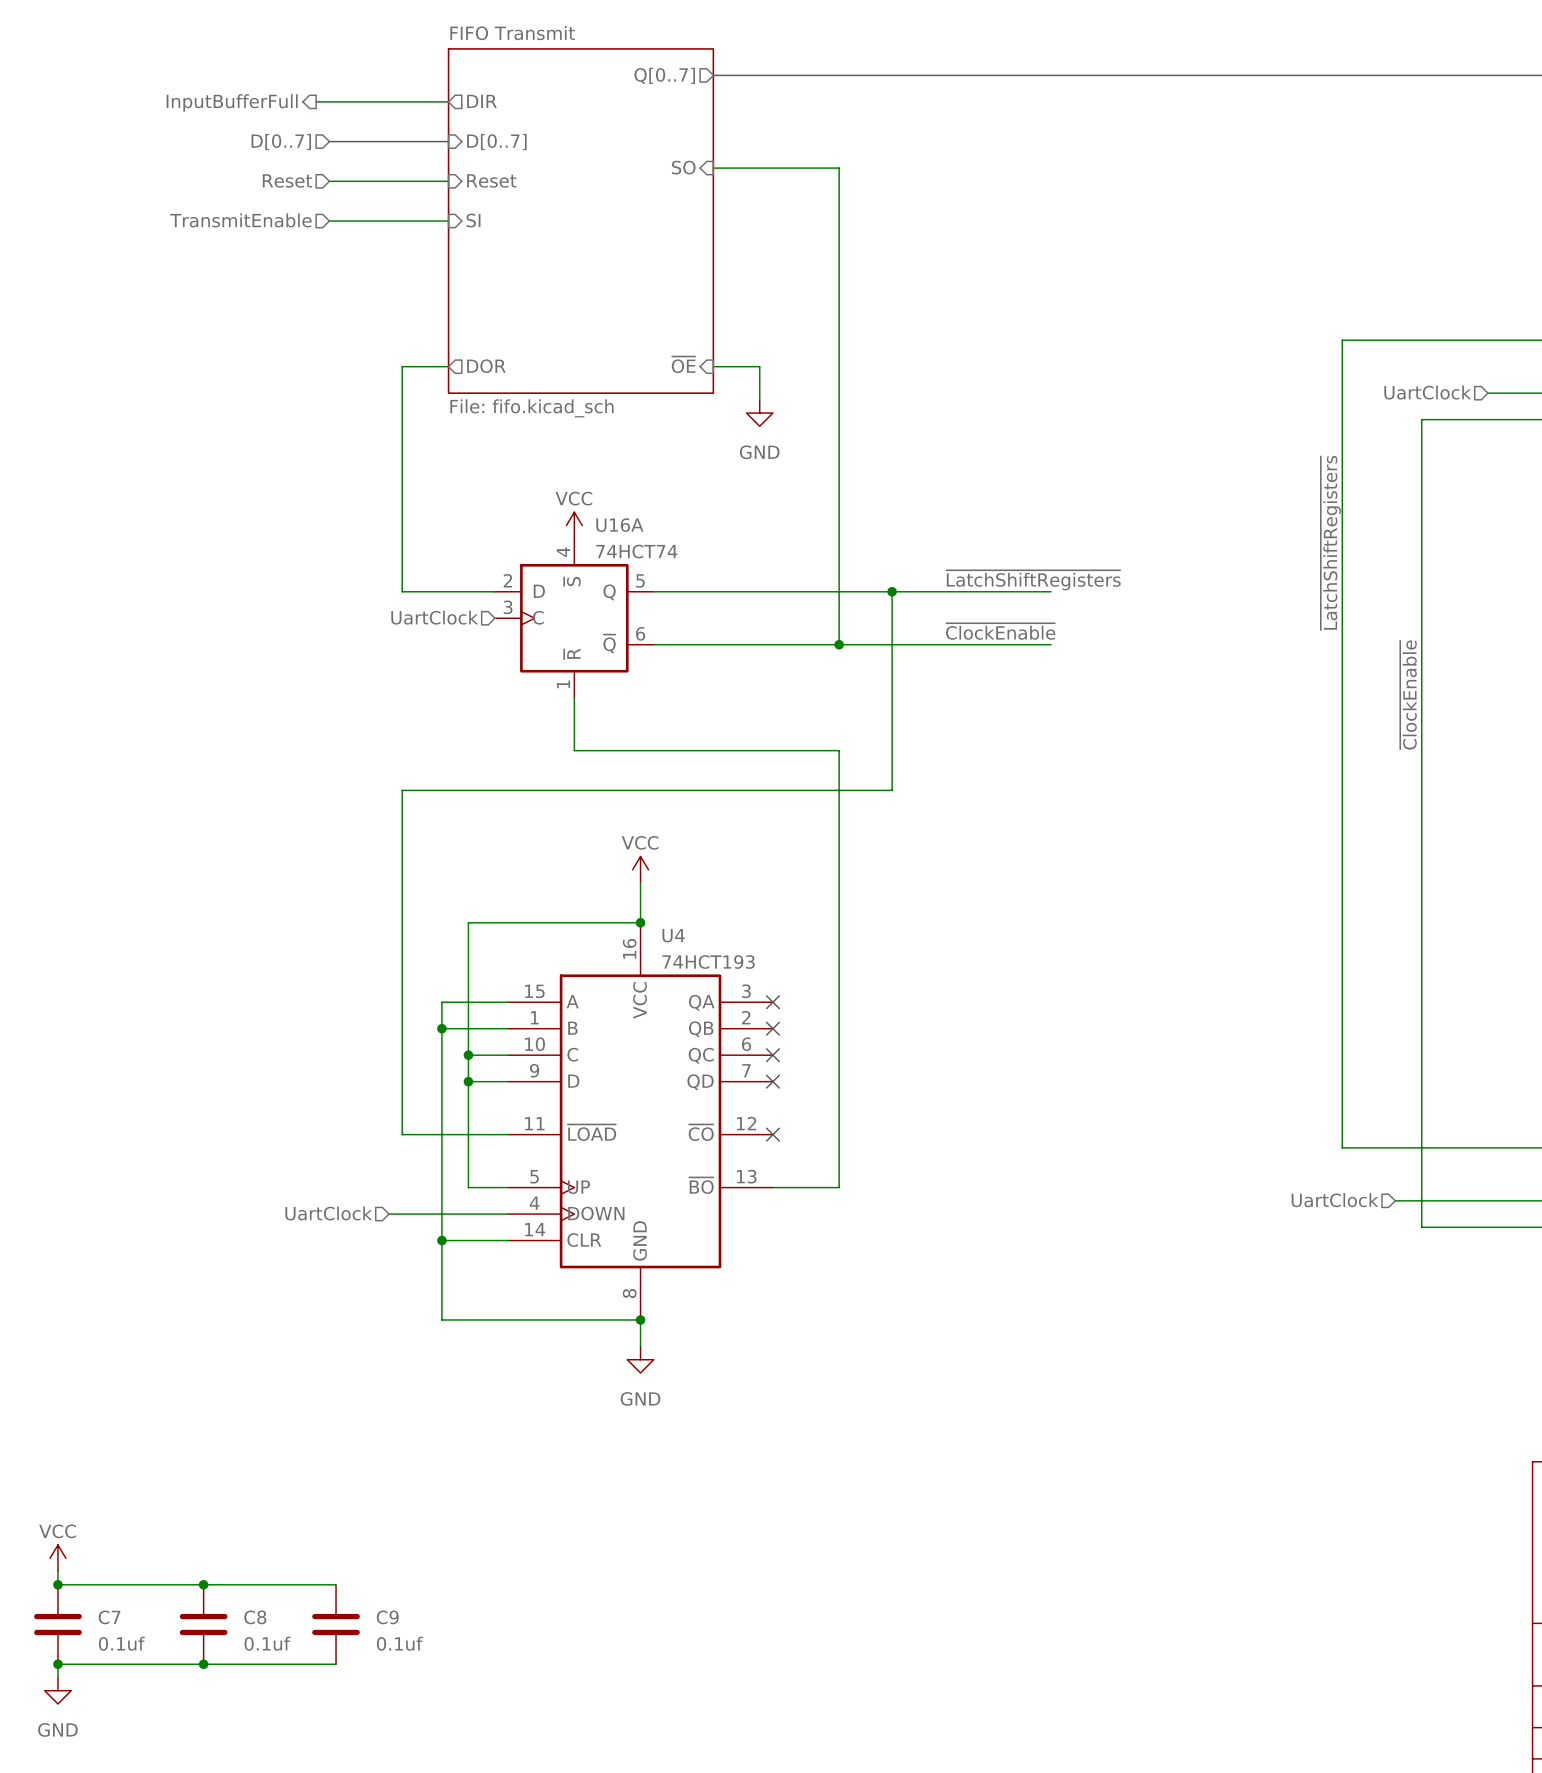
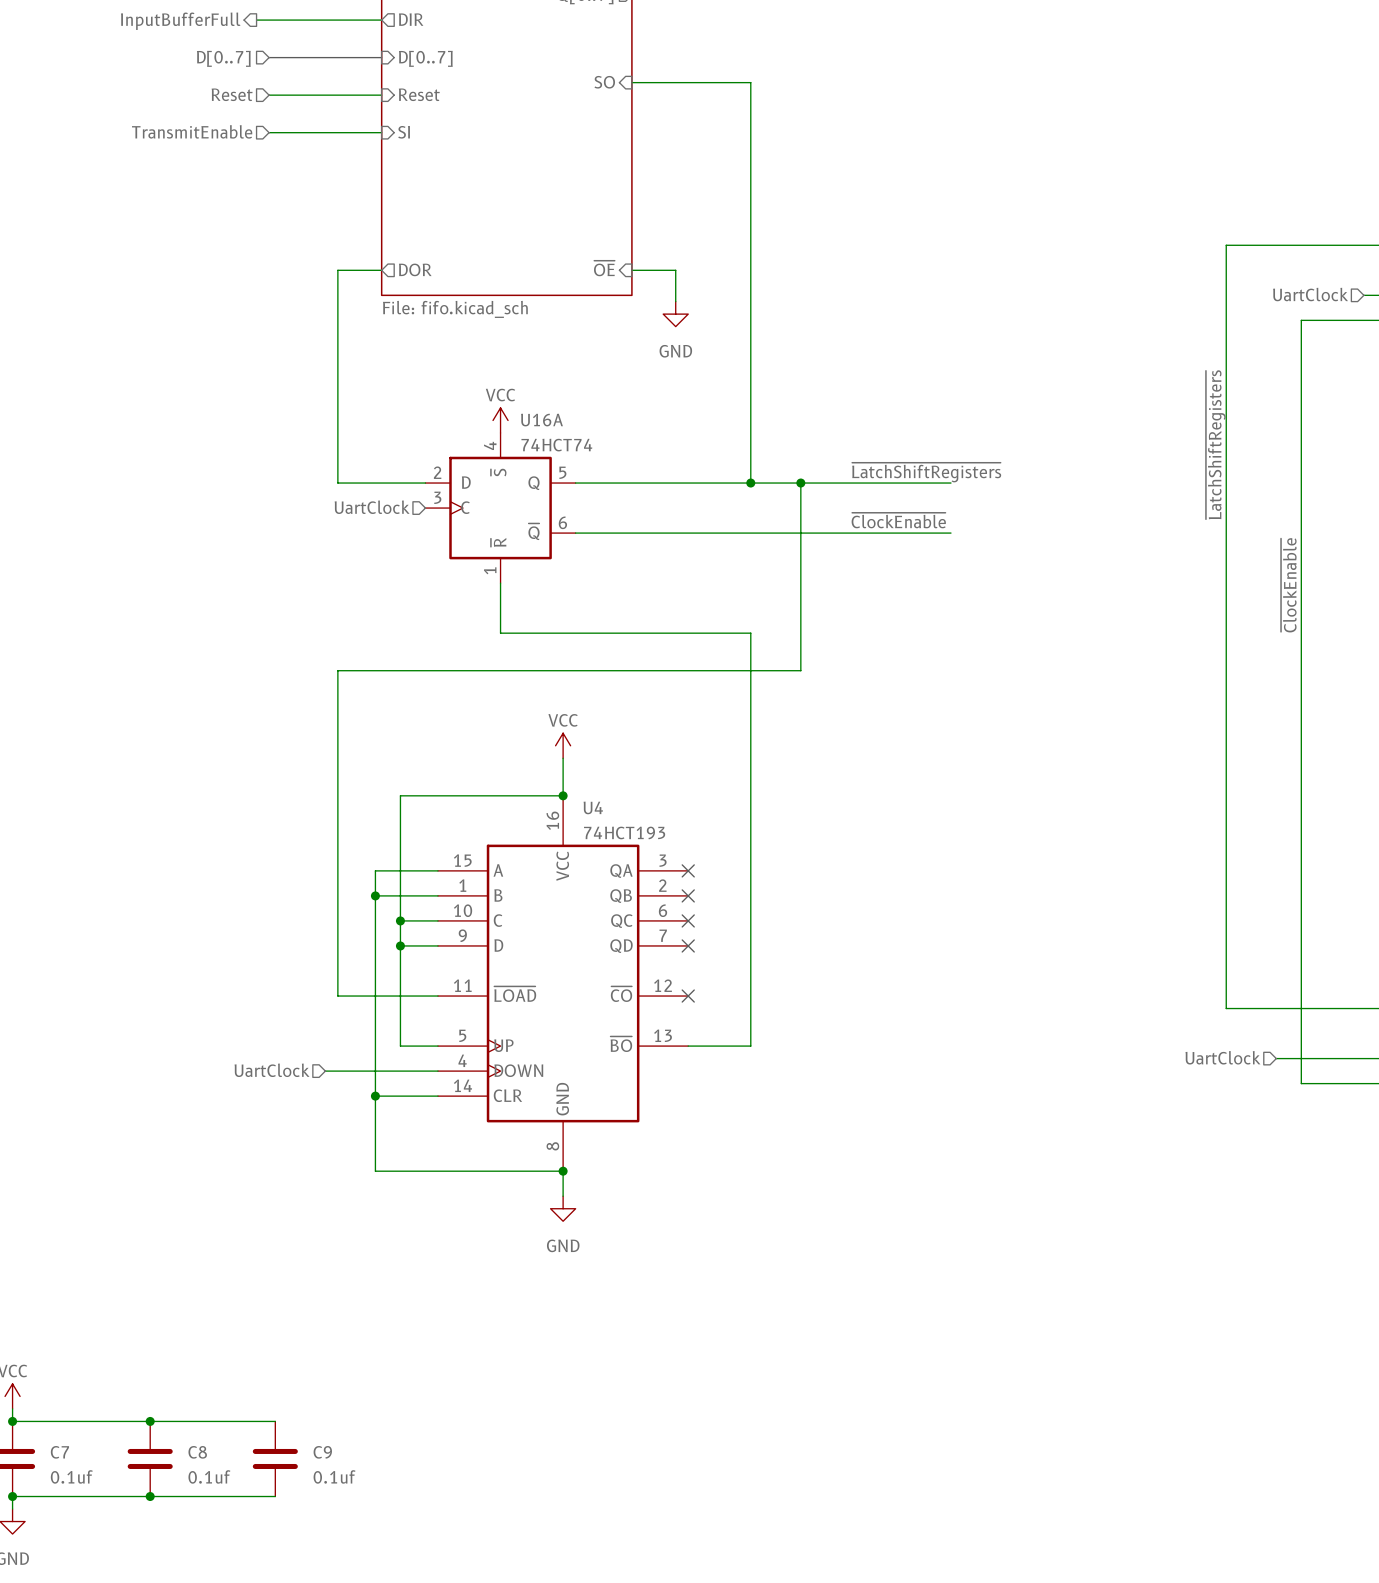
wire: (839, 591) (839, 644) -> none
junction position: (839, 644) -> (750, 483)

